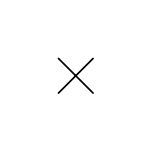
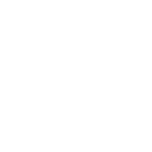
no-connect mark: (75, 75) -> none

